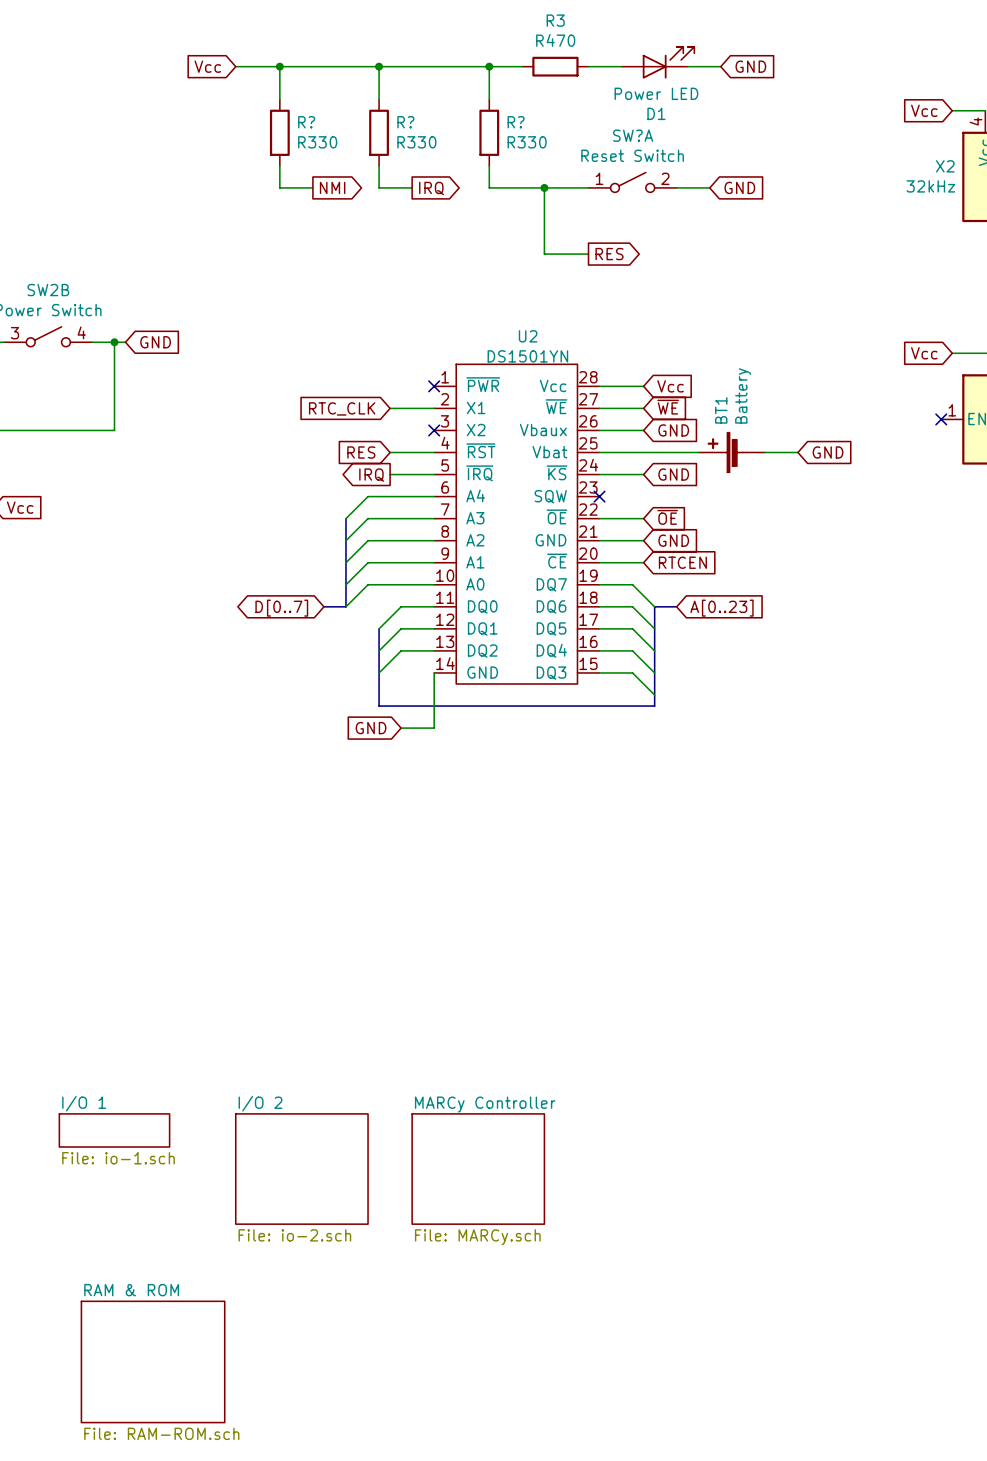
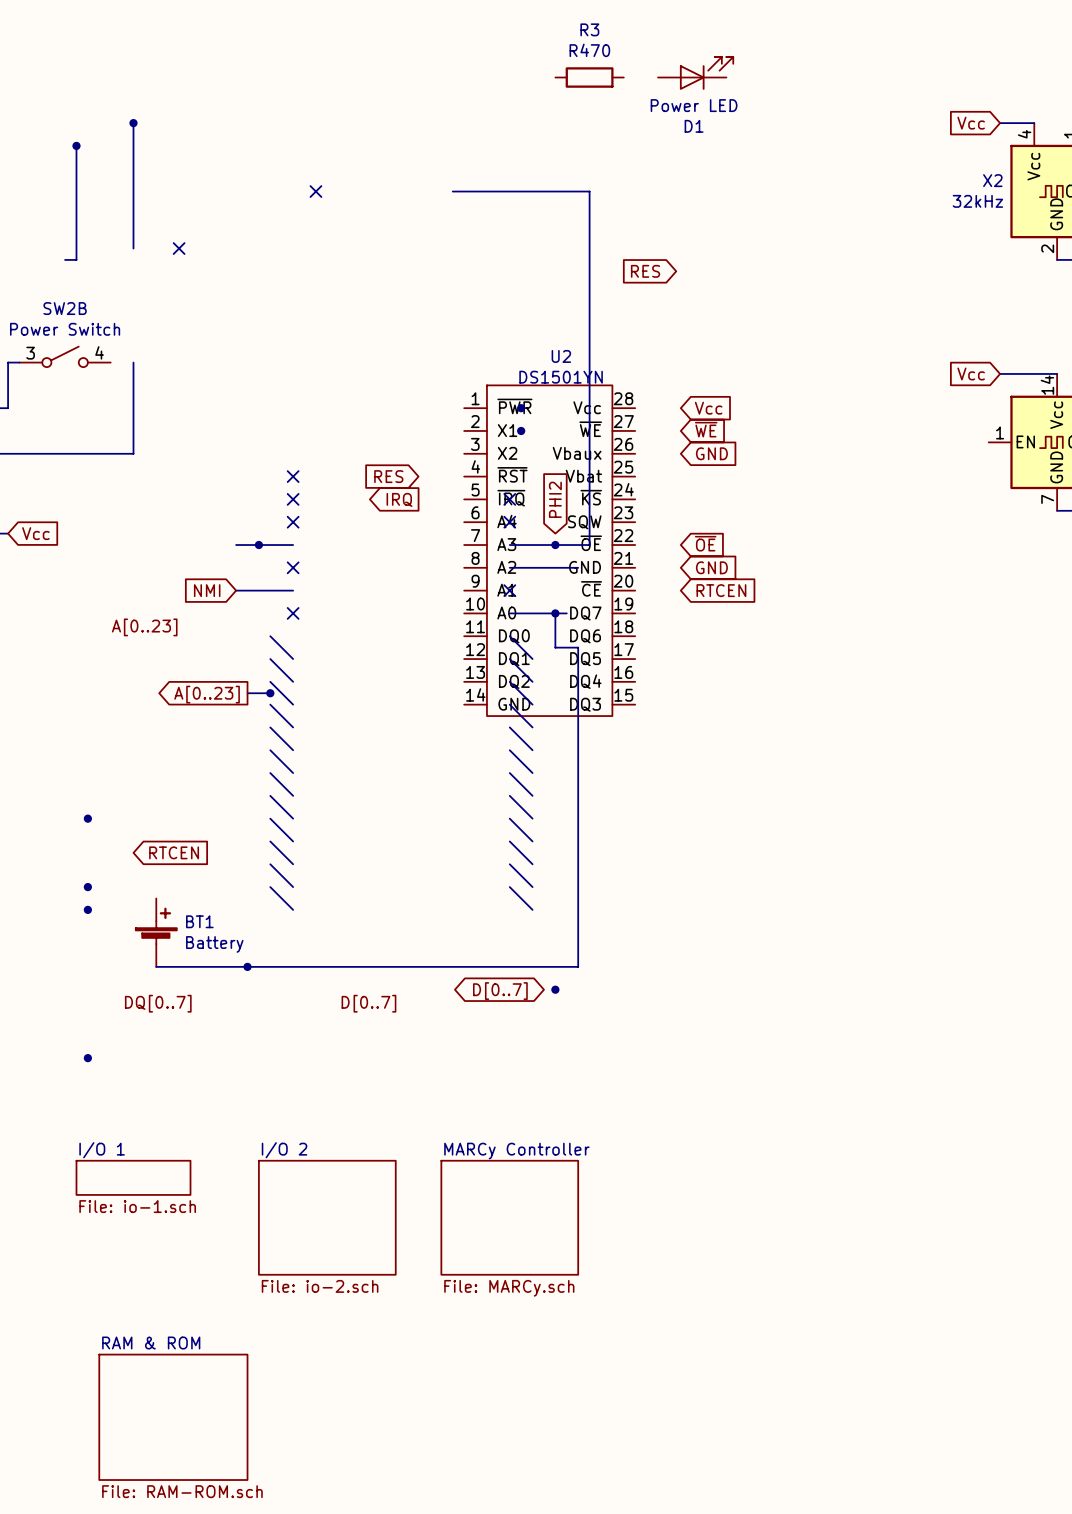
global label: Vcc (207, 66) -> none
wire: (235, 66) (522, 66) -> none
wire: (279, 66) (279, 99) -> none
junction: (279, 66) -> none
wire: (379, 66) (379, 99) -> none
junction: (379, 66) -> none
wire: (489, 66) (489, 99) -> none
junction: (489, 66) -> none
wire: (588, 66) (621, 66) -> none
wire: (687, 66) (720, 66) -> none
global label: GND (750, 66) -> none
wire: none -> (133, 123) (133, 248)
junction: none -> (133, 123)
wire: none -> (76, 145) (76, 259) (65, 259)
junction: none -> (76, 145)
R?: R330 (279, 132) -> none
R?: R330 (379, 132) -> none
R?: R330 (489, 132) -> none
wire: (279, 165) (279, 187) (312, 187) -> none
wire: (379, 165) (379, 187) (412, 187) -> none
wire: (489, 165) (489, 187) (588, 187) -> none
no-connect mark: none -> (315, 191)
wire: none -> (452, 191) (589, 191) (589, 545) (509, 545)
SW?A: Reset Switch (632, 182) -> none
global label: NMI (332, 187) -> none
wire: (544, 187) (544, 254) (588, 254) -> none
junction: (544, 187) -> none
wire: (676, 187) (709, 187) -> none
global label: GND (739, 187) -> none
global label: IRQ (431, 188) -> none
no-connect mark: none -> (179, 248)
wire: (92, 342) (125, 342) -> none
junction: (114, 342) -> none
global label: GND (155, 342) -> none
no-connect mark: (434, 386) -> none
junction: none -> (521, 408)
wire: (599, 386) (643, 386) -> none
global label: RTC_CLK (342, 408) -> none
wire: (390, 408) (434, 408) -> none
junction: none -> (521, 430)
wire: (599, 408) (643, 408) -> none
no-connect mark: (941, 419) -> none
no-connect mark: (434, 430) -> none
wire: (599, 430) (643, 430) -> none
no-connect mark: none -> (293, 476)
wire: (390, 452) (434, 452) -> none
wire: (599, 452) (698, 452) -> none
BT1 rotation: 0° (725, 452) -> 90° clockwise (156, 925)
BT1 position: (731, 452) -> (156, 932)
wire: (764, 452) (797, 452) -> none
global label: GND (828, 452) -> none
no-connect mark: none -> (293, 499)
wire: (390, 474) (434, 474) -> none
no-connect mark: none -> (509, 499)
global label: none -> PHI2 (555, 499)
wire: (599, 474) (643, 474) -> none
global label: GND (673, 474) -> none
no-connect mark: none -> (293, 522)
wire: (434, 496) (368, 496) (345, 518) -> none
no-connect mark: none -> (509, 522)
no-connect mark: (599, 496) -> none
wire: none -> (236, 545) (293, 545)
junction: none -> (258, 545)
bus: (345, 518) (345, 606) (323, 606) -> none
wire: (434, 518) (368, 518) (345, 540) -> none
junction: none -> (555, 545)
wire: (599, 518) (643, 518) -> none
no-connect mark: none -> (293, 567)
wire: (434, 540) (368, 540) (345, 562) -> none
wire: none -> (509, 567) (578, 567)
wire: (599, 540) (643, 540) -> none
global label: none -> NMI (207, 590)
wire: none -> (236, 590) (293, 590)
wire: (434, 562) (368, 562) (345, 584) -> none
no-connect mark: none -> (509, 590)
wire: (599, 562) (643, 562) -> none
no-connect mark: none -> (293, 613)
wire: (434, 584) (368, 584) (345, 606) -> none
wire: none -> (509, 613) (566, 613)
wire: none -> (555, 613) (555, 647) (578, 647) (578, 966) (156, 966)
junction: none -> (555, 613)
wire: (599, 584) (632, 584) (654, 606) -> none
label: none -> A[0..23] (144, 627)
wire: none -> (270, 636) (293, 659)
wire: (434, 606) (401, 606) (379, 628) -> none
wire: none -> (509, 636) (532, 659)
wire: (599, 606) (632, 606) (654, 628) -> none
bus: (676, 606) (654, 606) (654, 706) (379, 706) (379, 628) -> none
global label: D[0..7] (281, 608) -> none
global label: A[0..23] (721, 608) -> none
wire: none -> (270, 659) (293, 681)
wire: (434, 628) (401, 628) (379, 650) -> none
wire: none -> (509, 659) (532, 681)
wire: (599, 628) (632, 628) (654, 650) -> none
wire: none -> (270, 681) (293, 704)
wire: (434, 650) (401, 650) (379, 672) -> none
wire: none -> (509, 681) (532, 704)
wire: (599, 650) (632, 650) (654, 672) -> none
bus: none -> (247, 693) (270, 693)
junction: none -> (270, 693)
global label: none -> A[0..23] (207, 694)
wire: none -> (270, 704) (293, 727)
wire: (434, 672) (434, 728) (401, 728) -> none
wire: none -> (509, 704) (532, 727)
wire: (599, 672) (632, 672) (654, 695) -> none
wire: none -> (270, 727) (293, 750)
wire: none -> (509, 727) (532, 750)
wire: none -> (270, 750) (293, 773)
wire: none -> (509, 750) (532, 773)
global label: GND (371, 728) -> none
wire: none -> (270, 773) (293, 795)
wire: none -> (509, 773) (532, 795)
wire: none -> (270, 795) (293, 818)
wire: none -> (509, 795) (532, 818)
junction: none -> (87, 818)
wire: none -> (270, 818) (293, 841)
wire: none -> (509, 818) (532, 841)
wire: none -> (270, 841) (293, 864)
wire: none -> (509, 841) (532, 864)
global label: none -> RTCEN (174, 852)
wire: none -> (270, 864) (293, 887)
wire: none -> (509, 864) (532, 887)
junction: none -> (87, 887)
wire: none -> (270, 887) (293, 909)
wire: none -> (509, 887) (532, 909)
junction: none -> (87, 909)
junction: none -> (247, 966)
junction: none -> (555, 989)
global label: none -> D[0..7] (500, 991)
label: none -> DQ[0..7] (158, 1003)
label: none -> D[0..7] (368, 1003)
junction: none -> (87, 1058)

